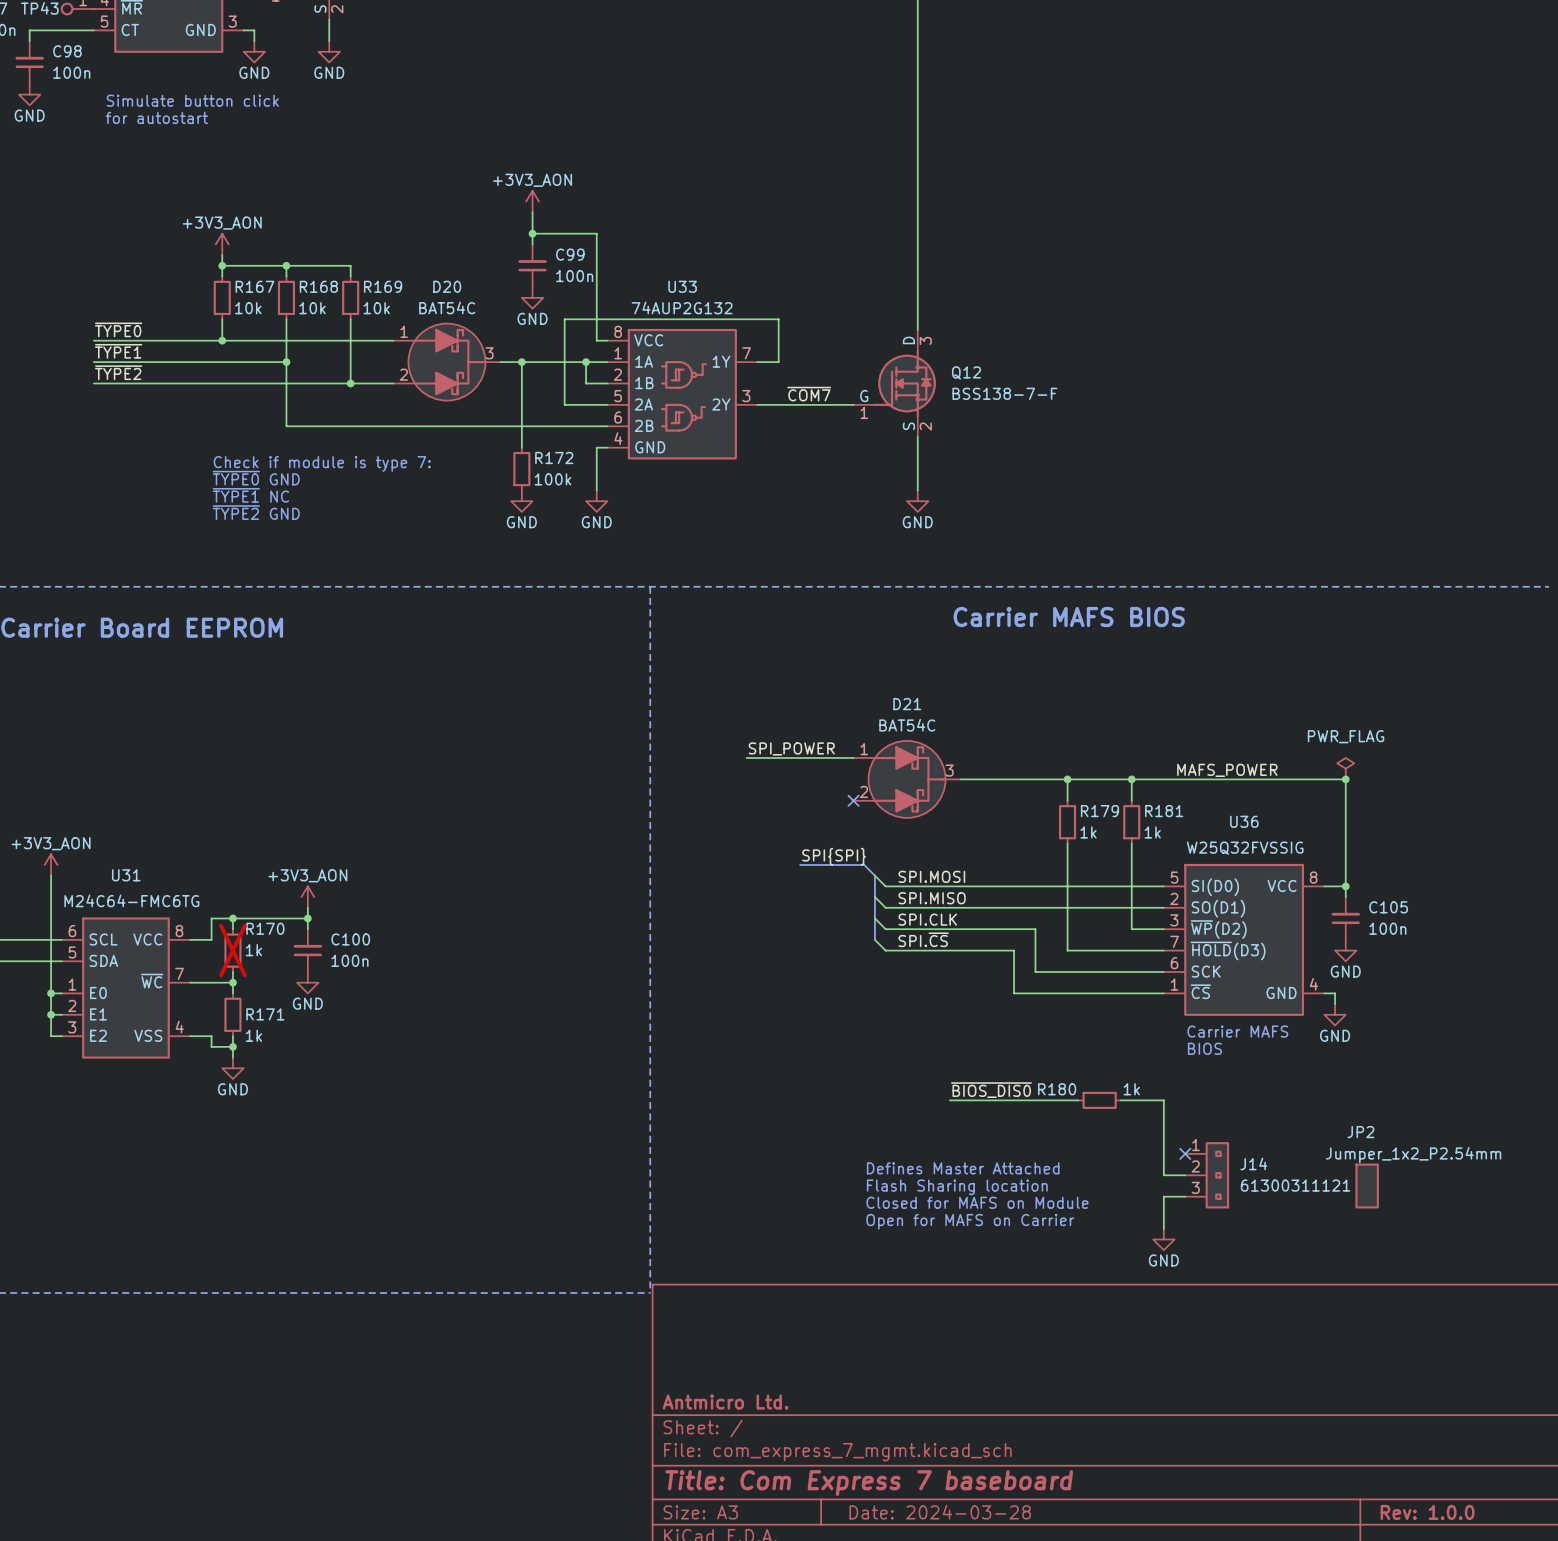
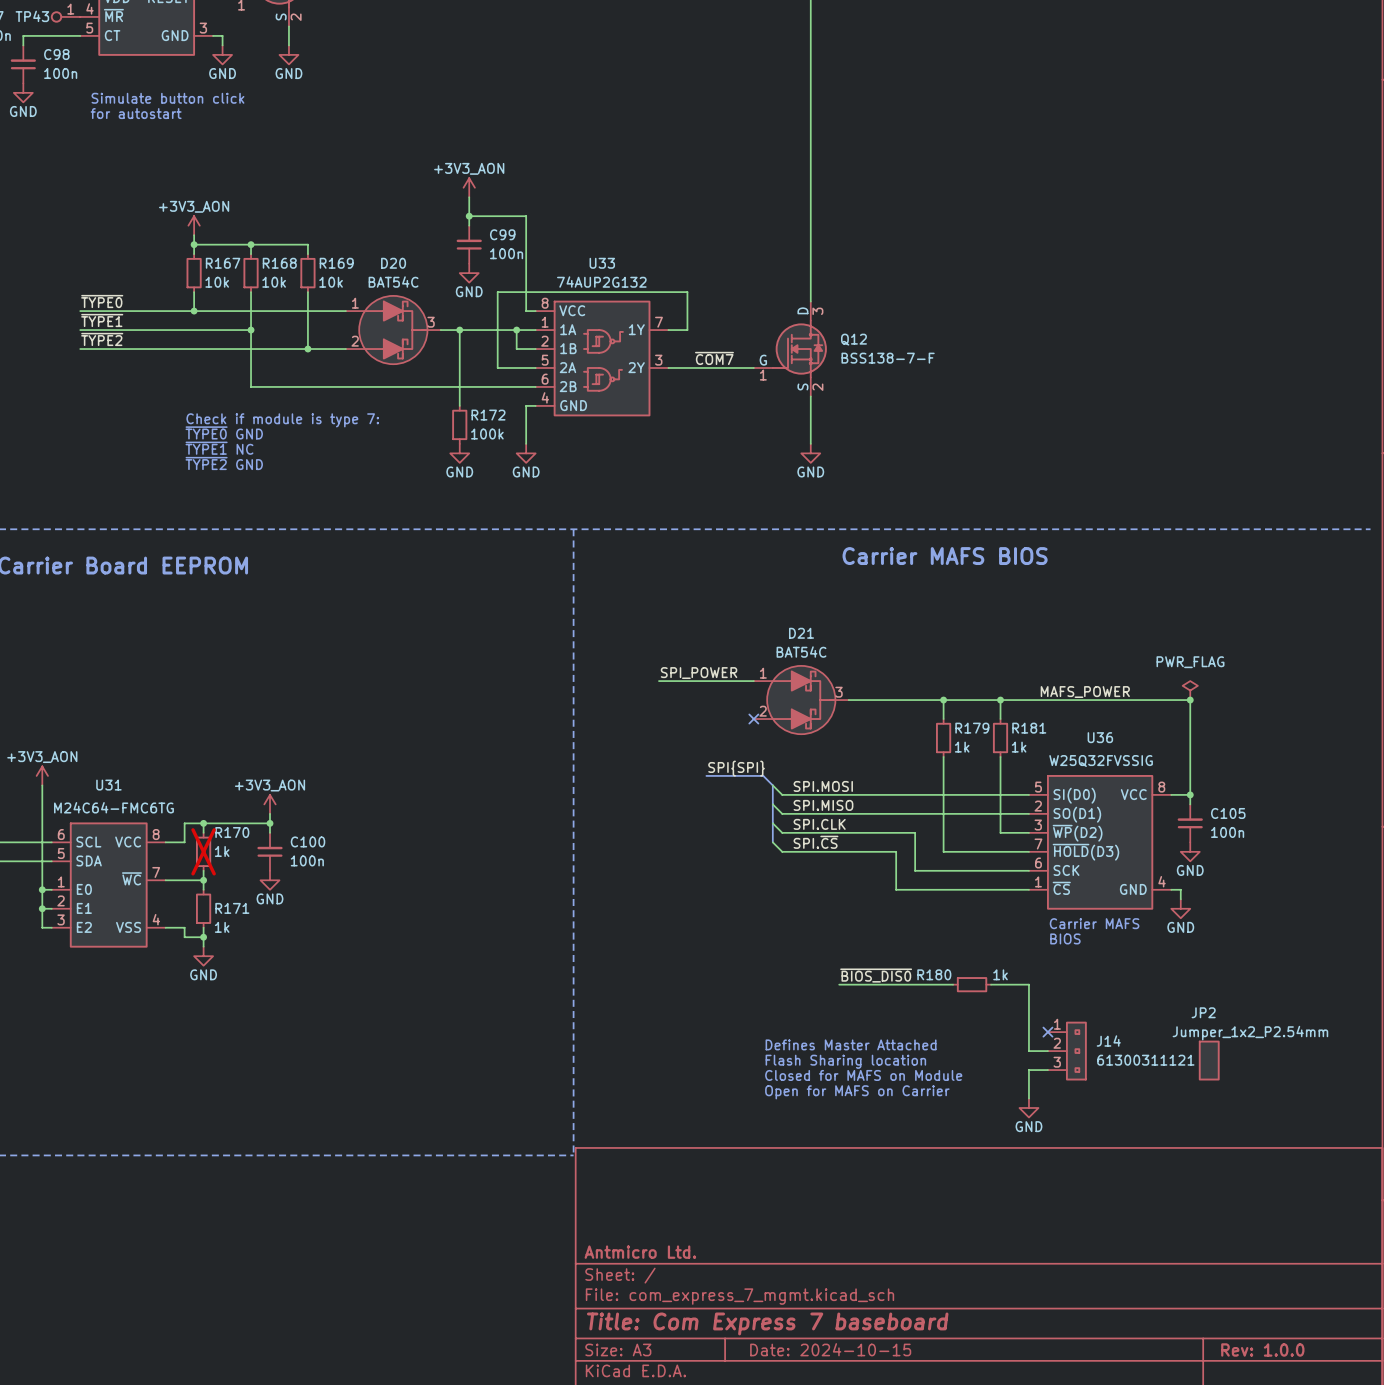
title block: Date: 2024-03-28 (940, 1512) -> Date: 2024-10-15 (830, 1349)

